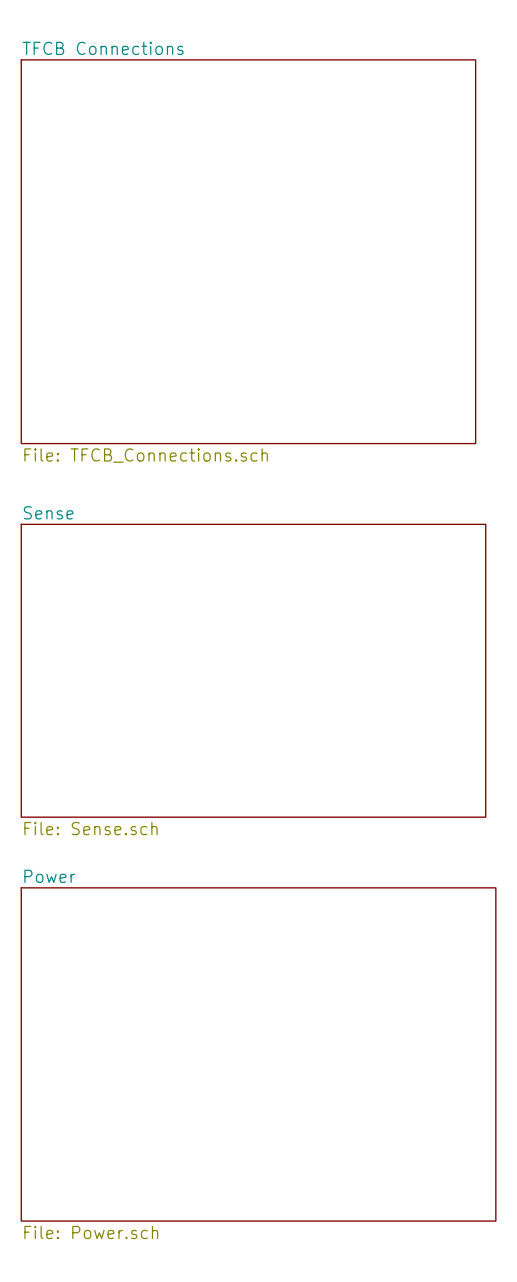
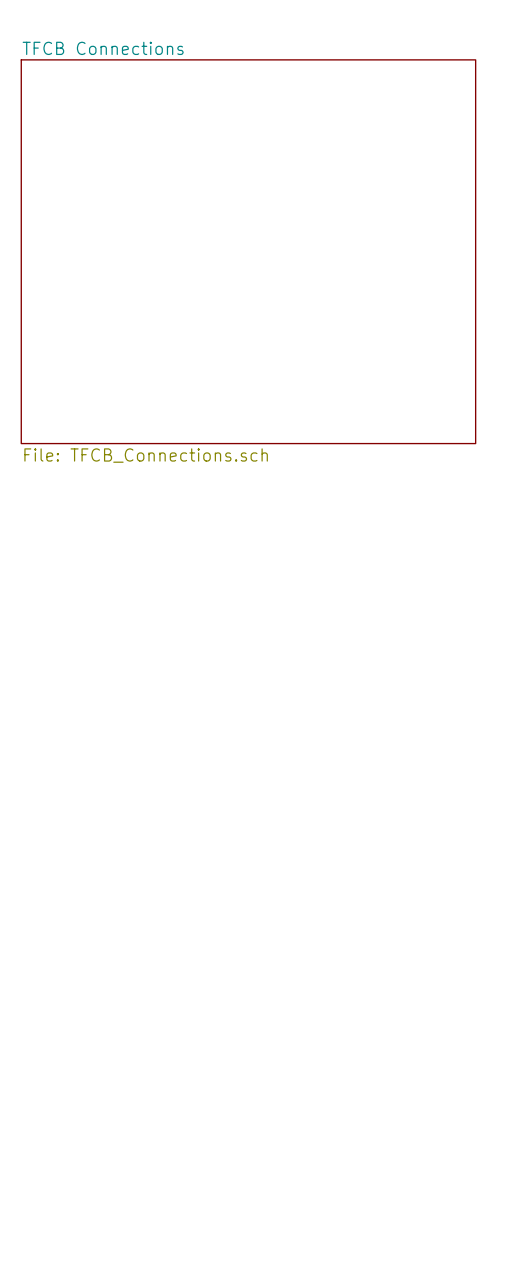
sheet Sense: File: Sense.sch (253, 670) -> none
sheet Power: File: Power.sch (258, 1054) -> none

